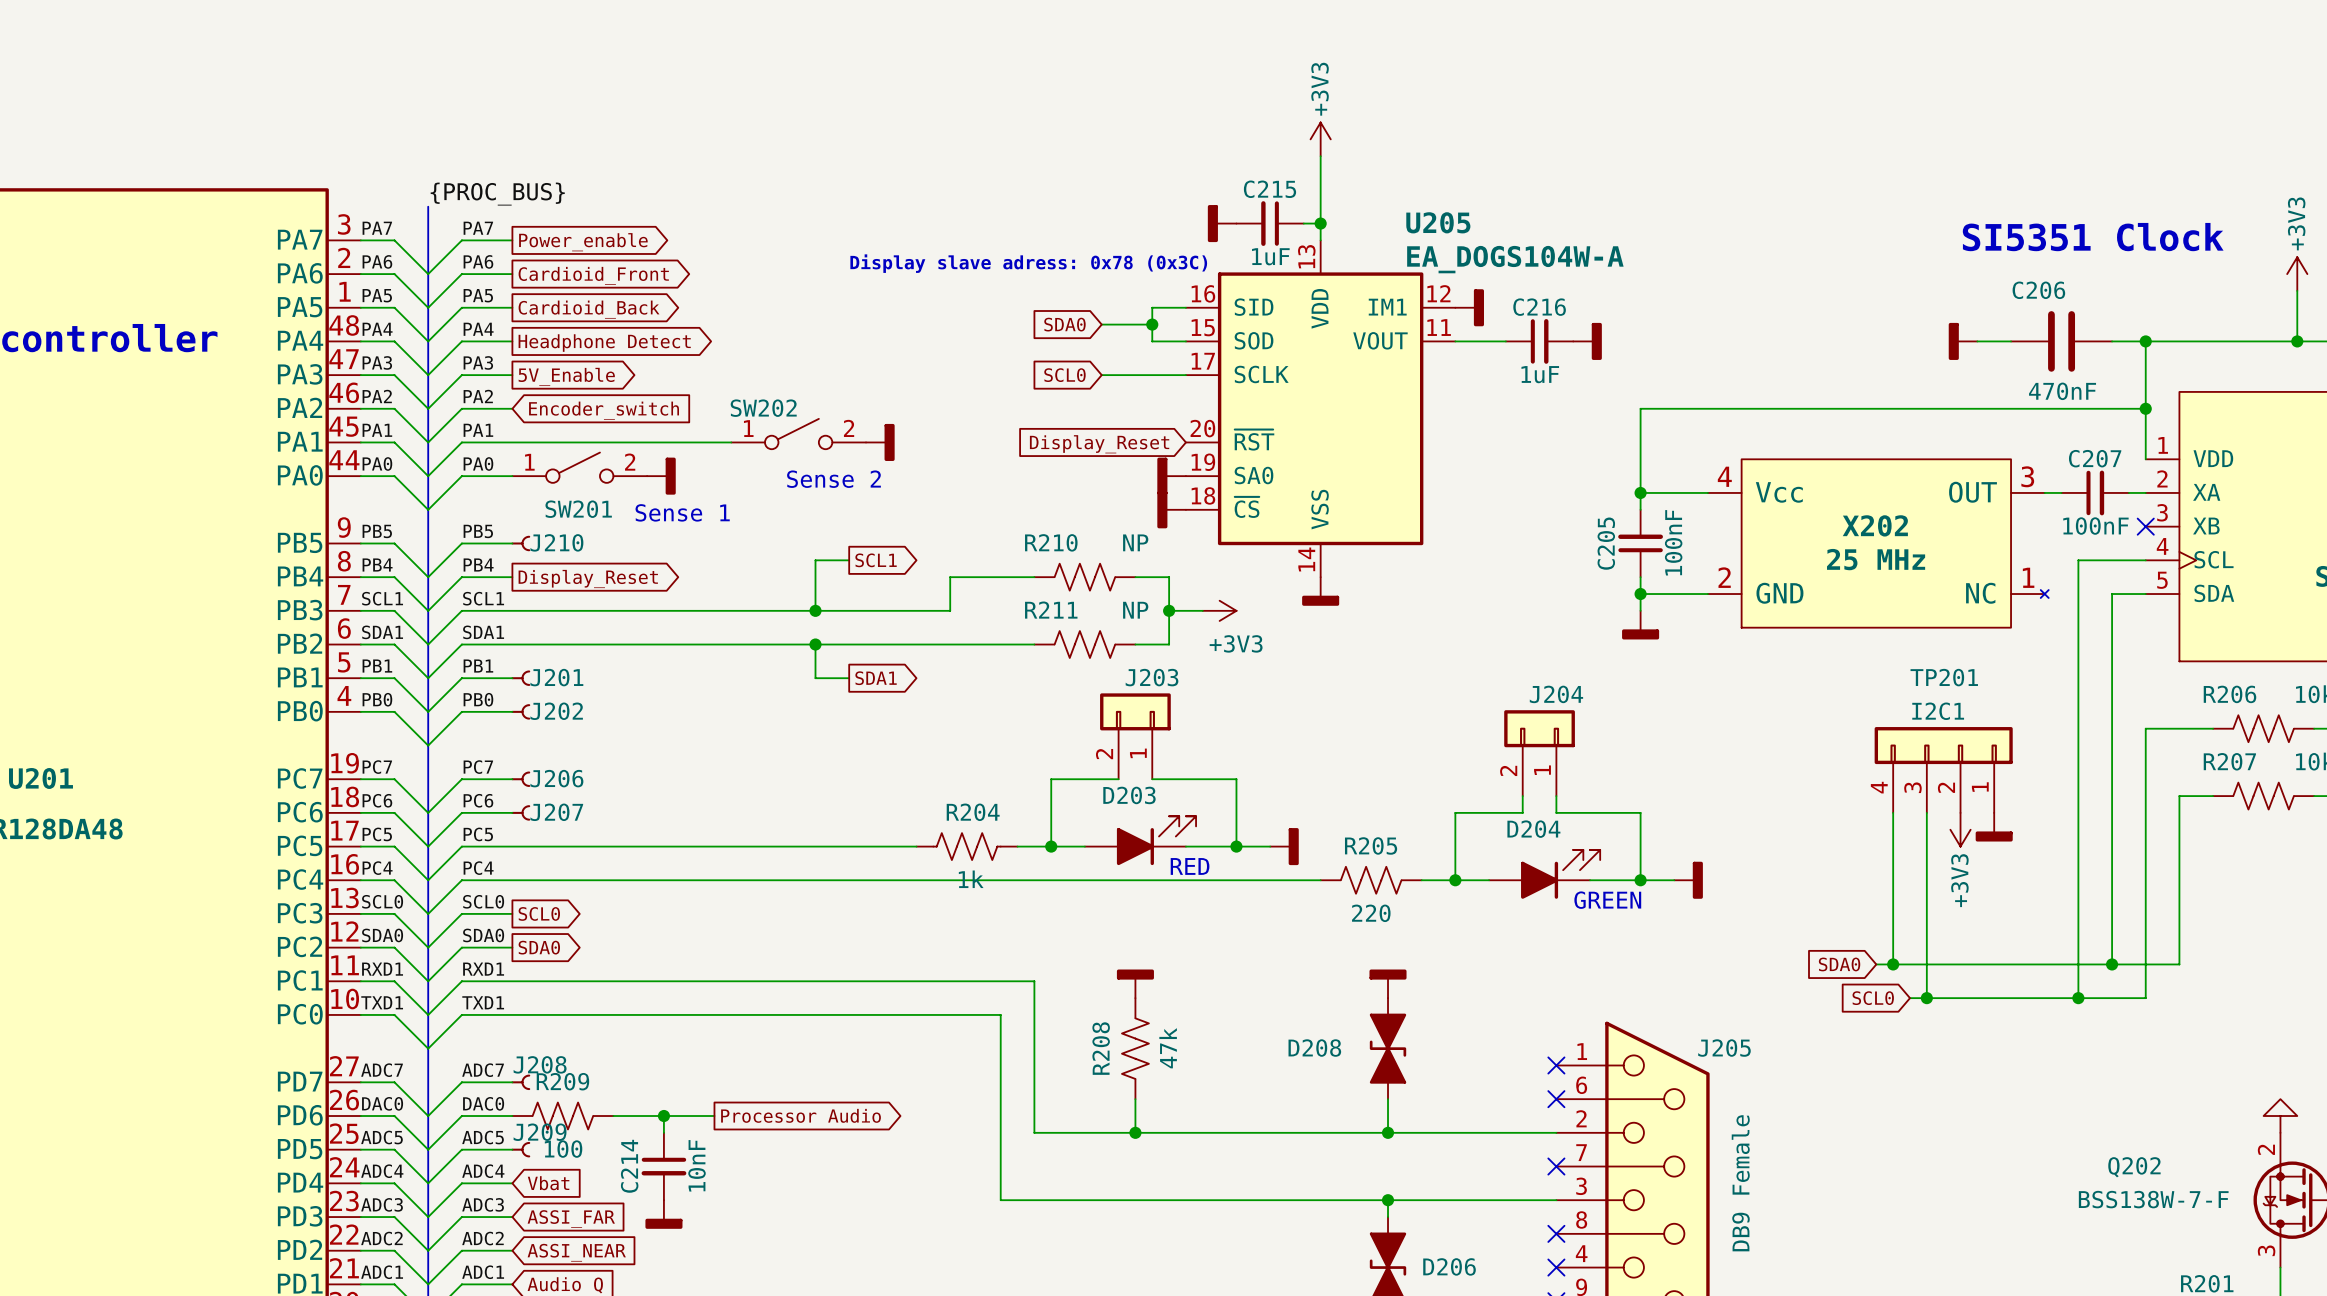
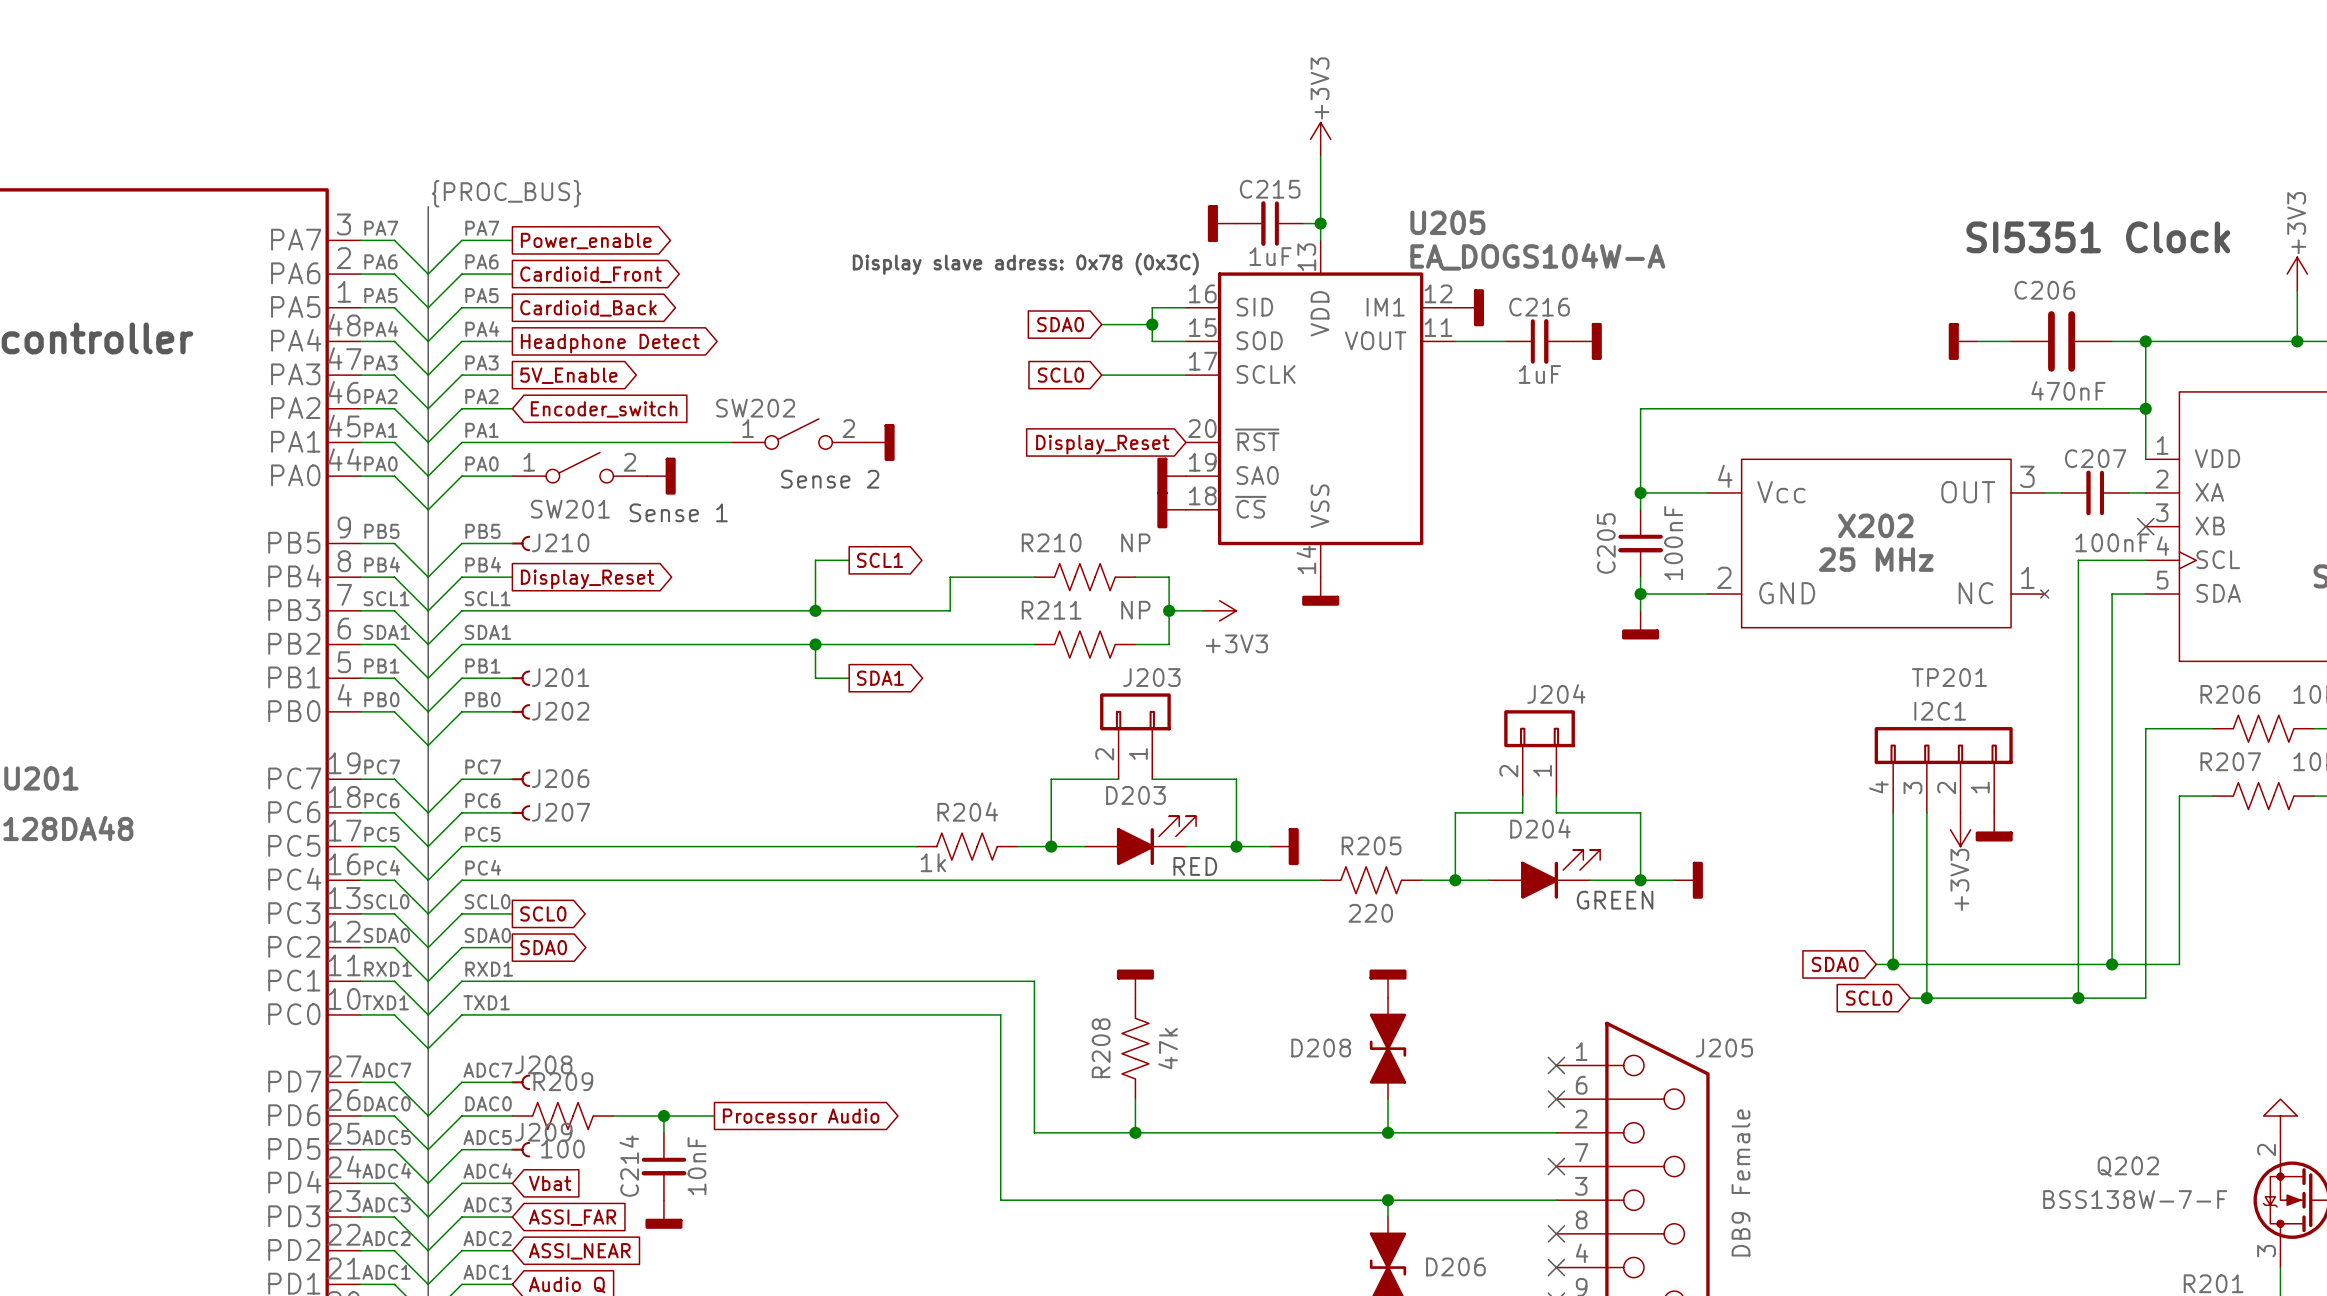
C207 rotation: 0° (2095, 492) -> 180° (2095, 492)
C205 rotation: 0° (1640, 543) -> 180° (1640, 543)
R204 value position: 1k (971, 879) -> 1k (933, 862)

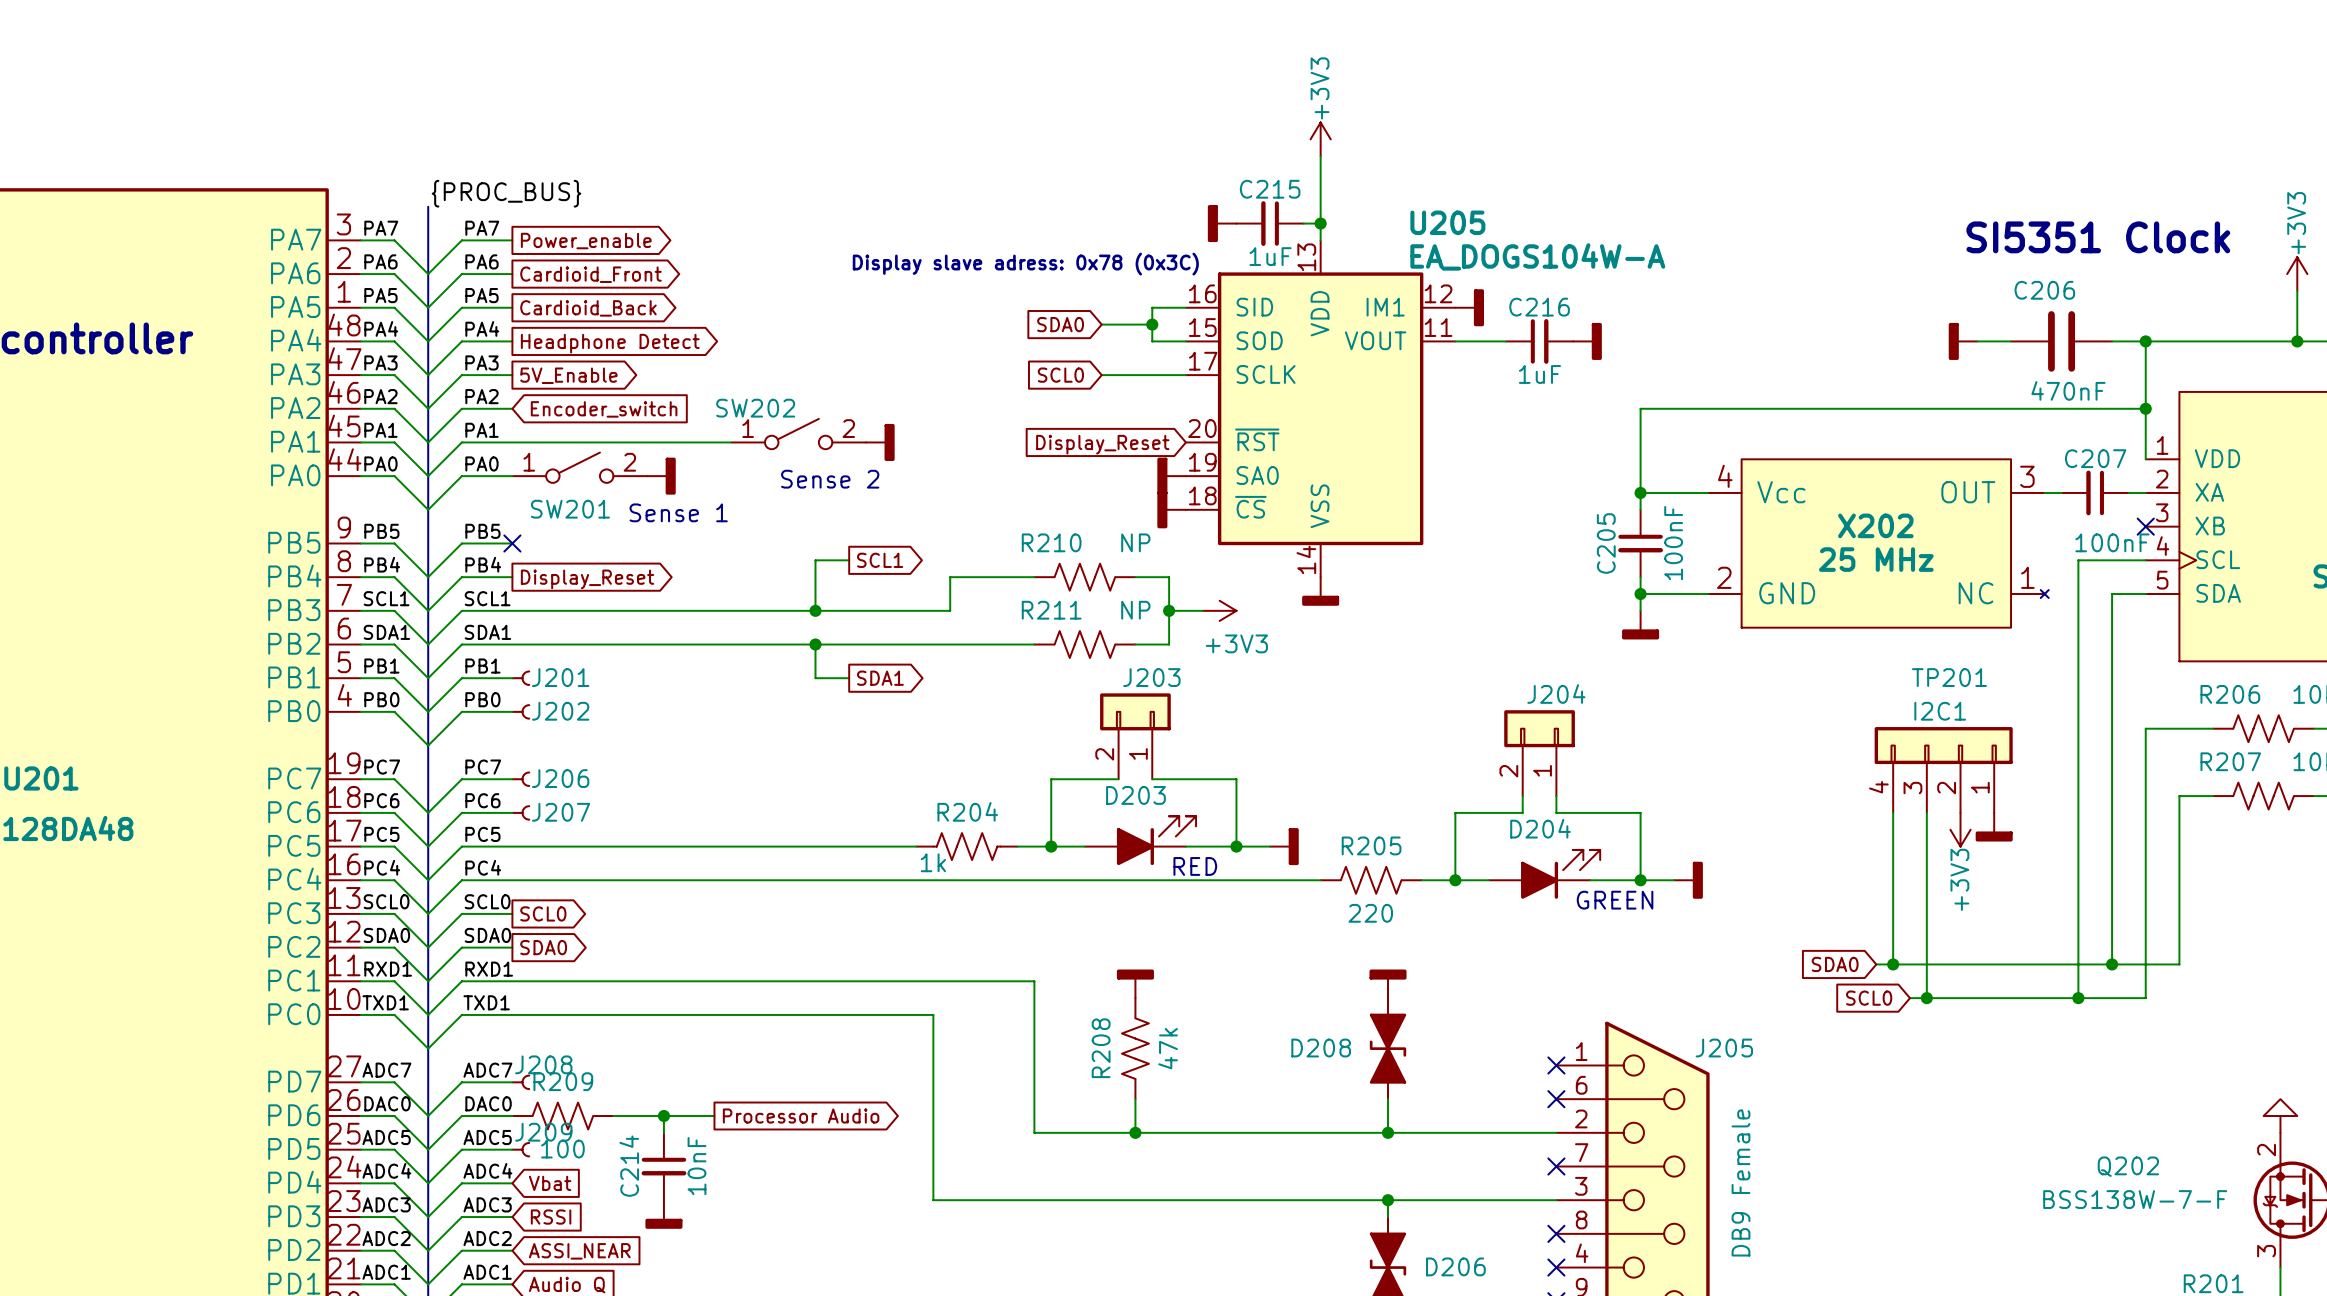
no-connect mark: none -> (512, 543)
J210: (520, 543) -> none
wire: (933, 1014) (1000, 1014) (1000, 1200) -> (933, 1014) (933, 1200) (1000, 1200)
global label: ASSI_FAR (572, 1217) -> RSSI (551, 1217)

